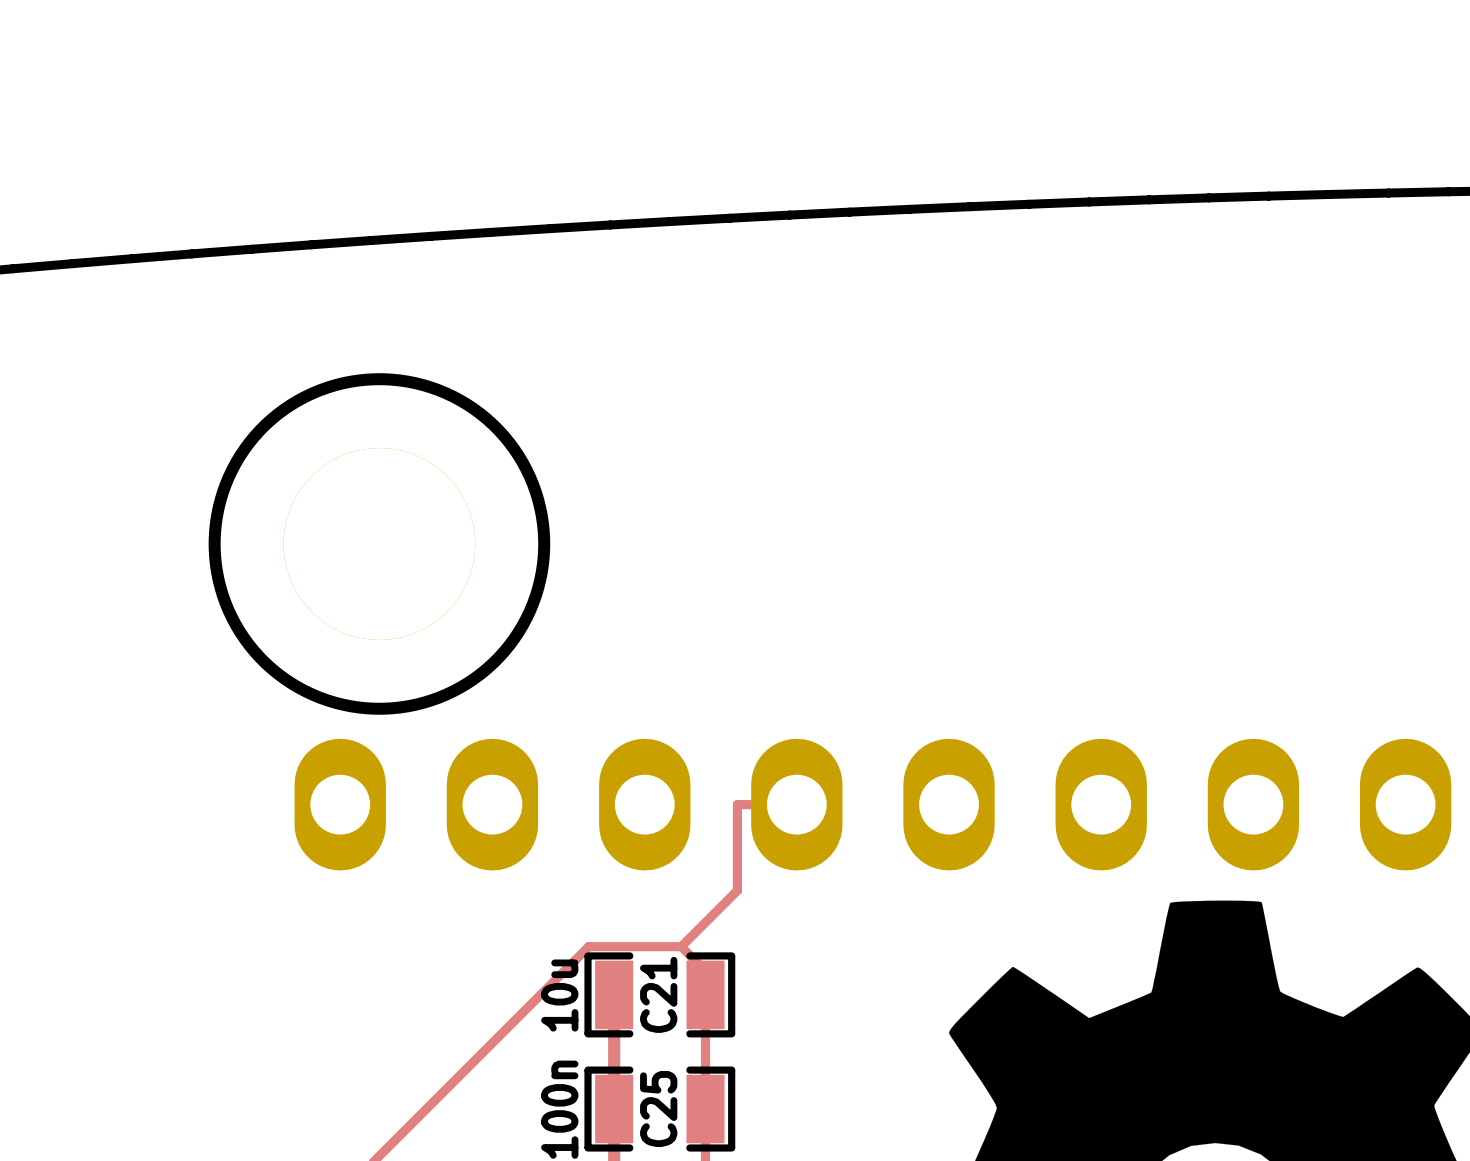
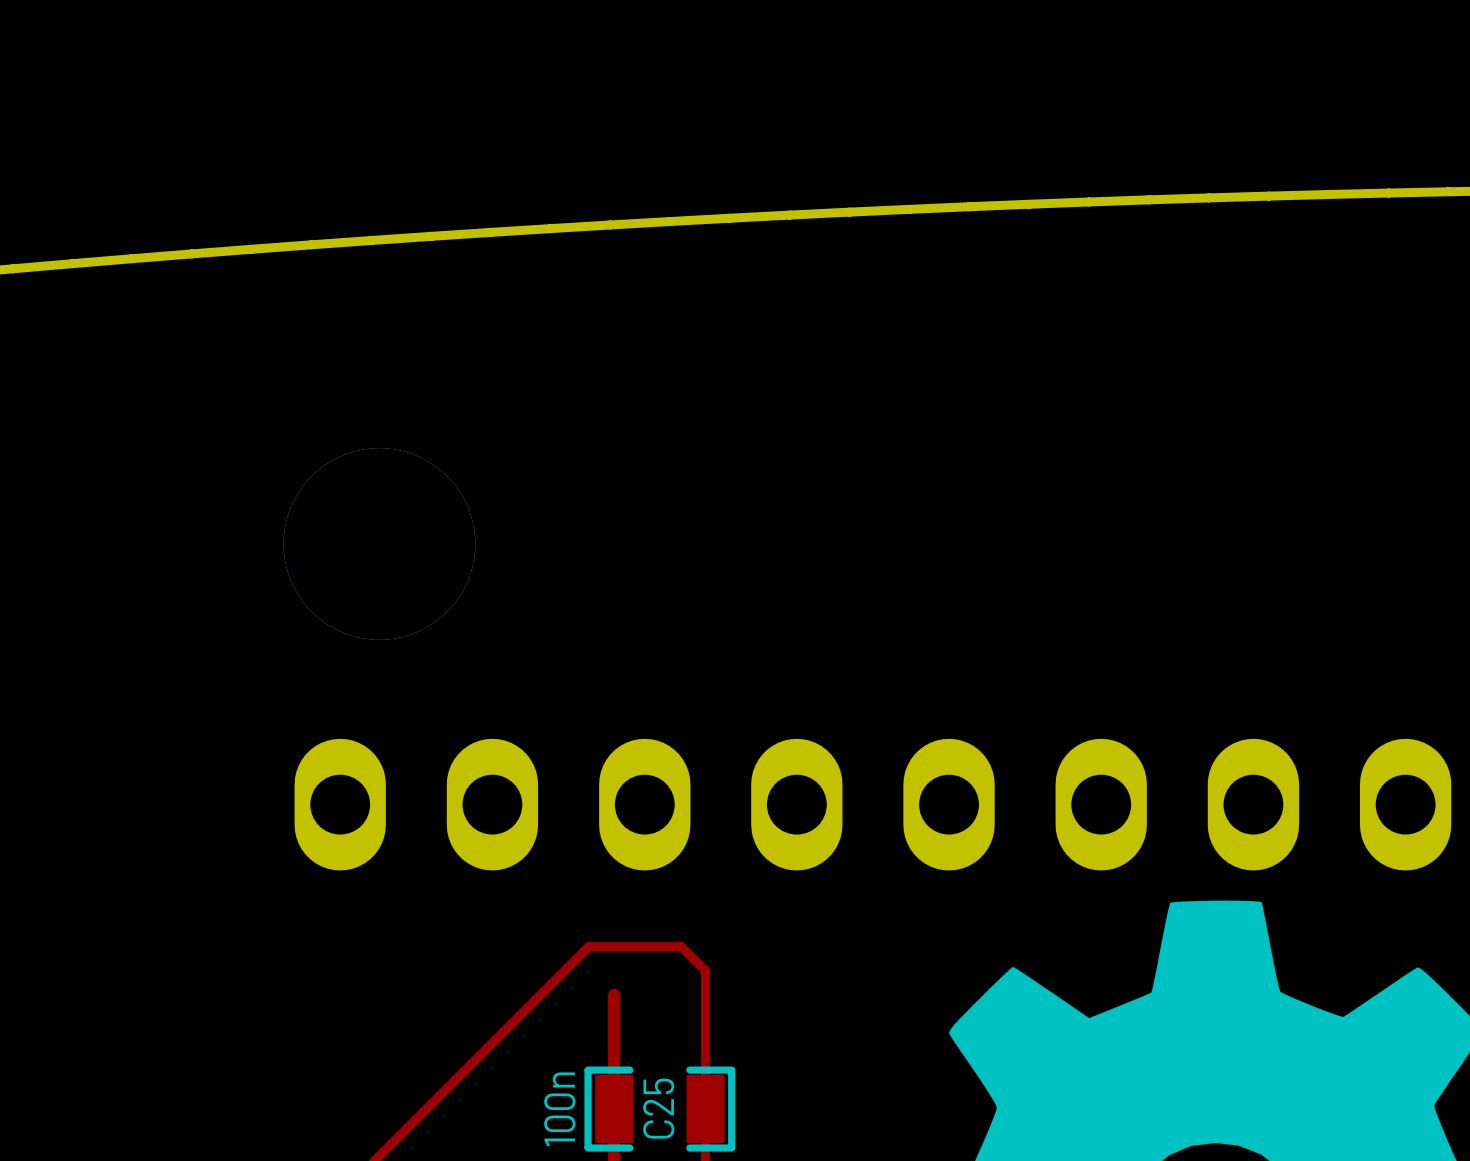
drawing: [208, 373, 551, 715] -> none
track: (796, 804) (737, 804) (737, 890) (681, 946) -> none
C21: 10u (659, 994) -> none

